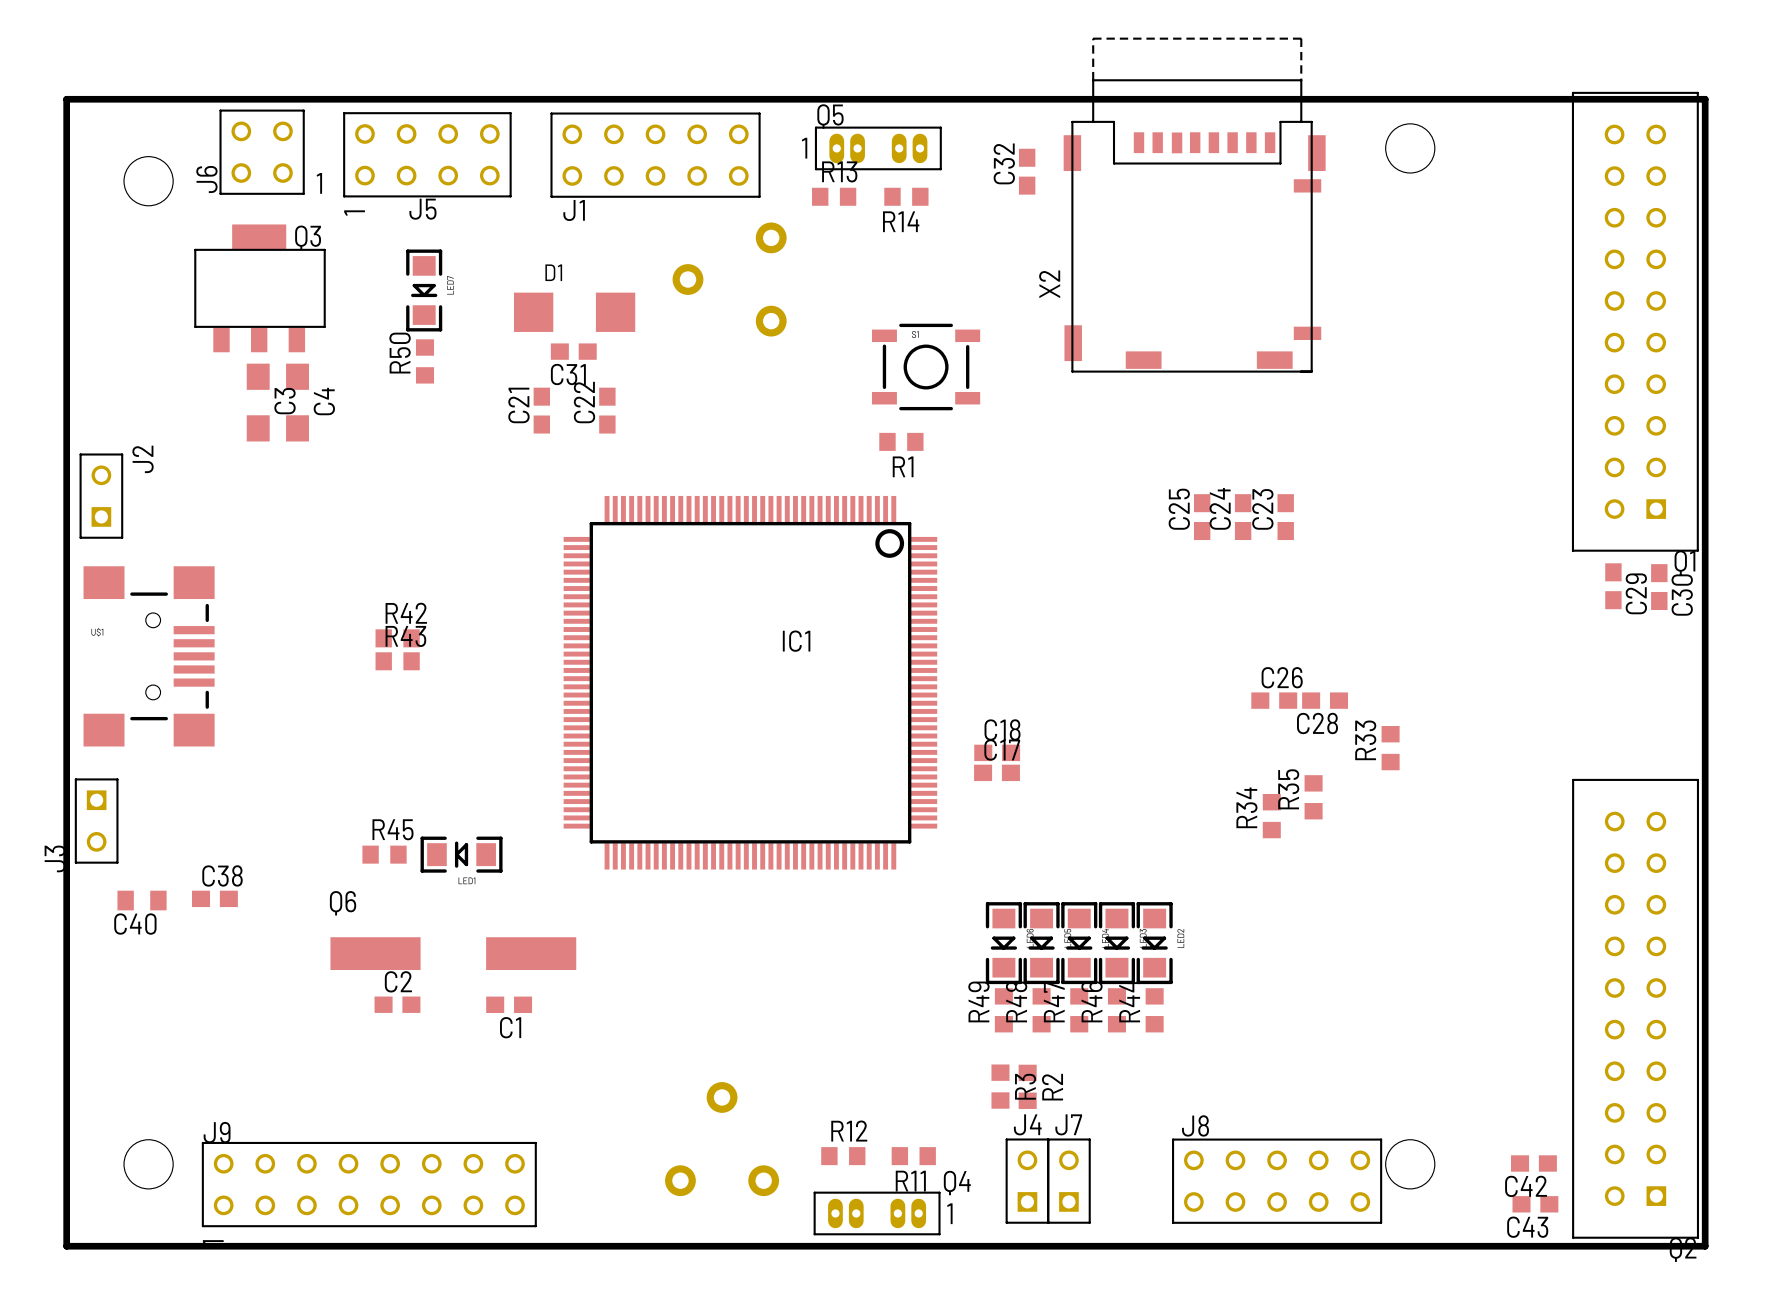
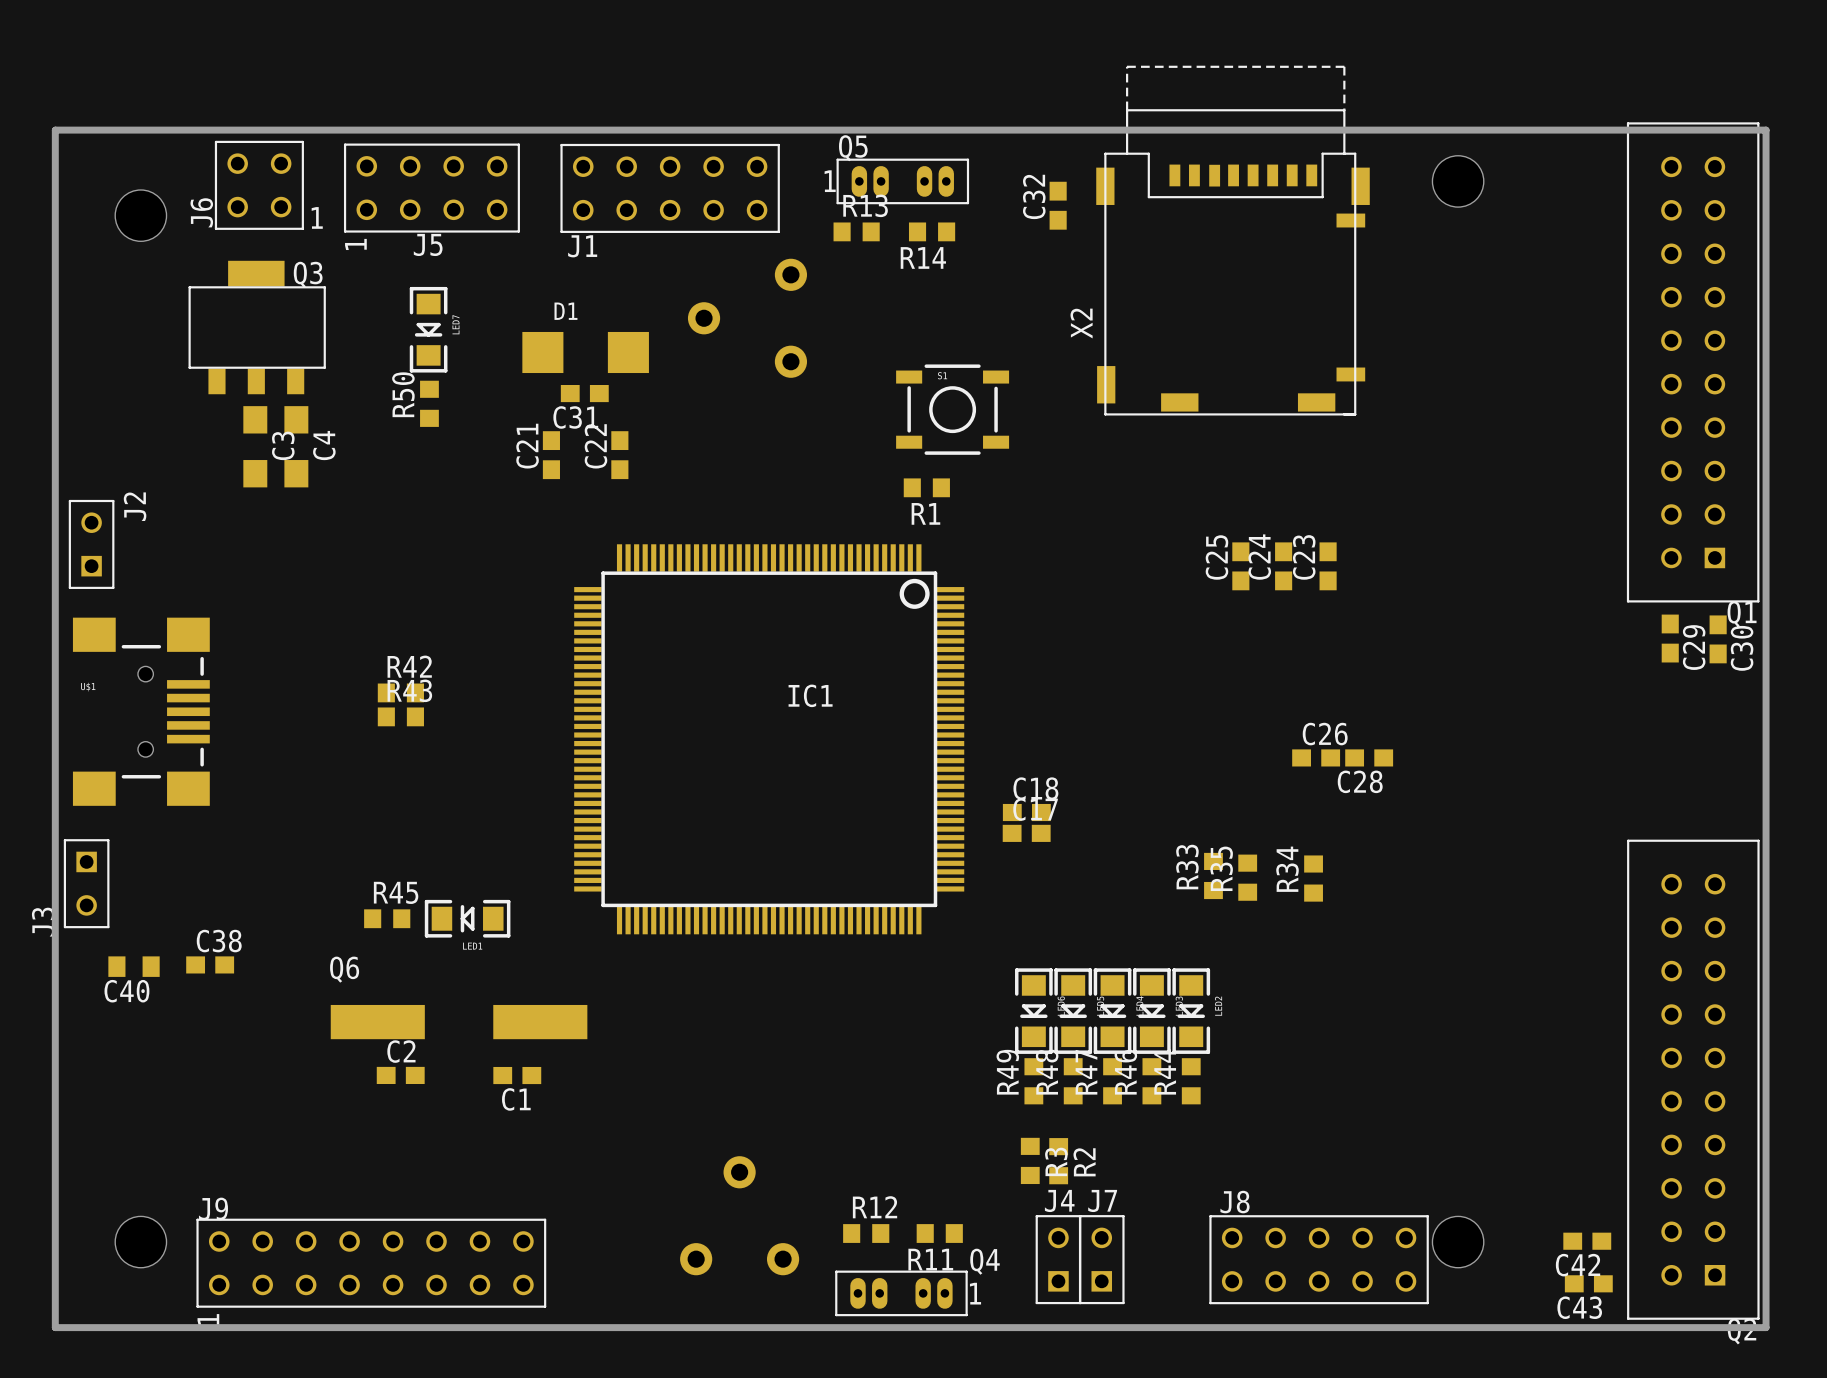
R33 position: (1390, 748) -> (1213, 875)
R35 position: (1313, 797) -> (1247, 877)

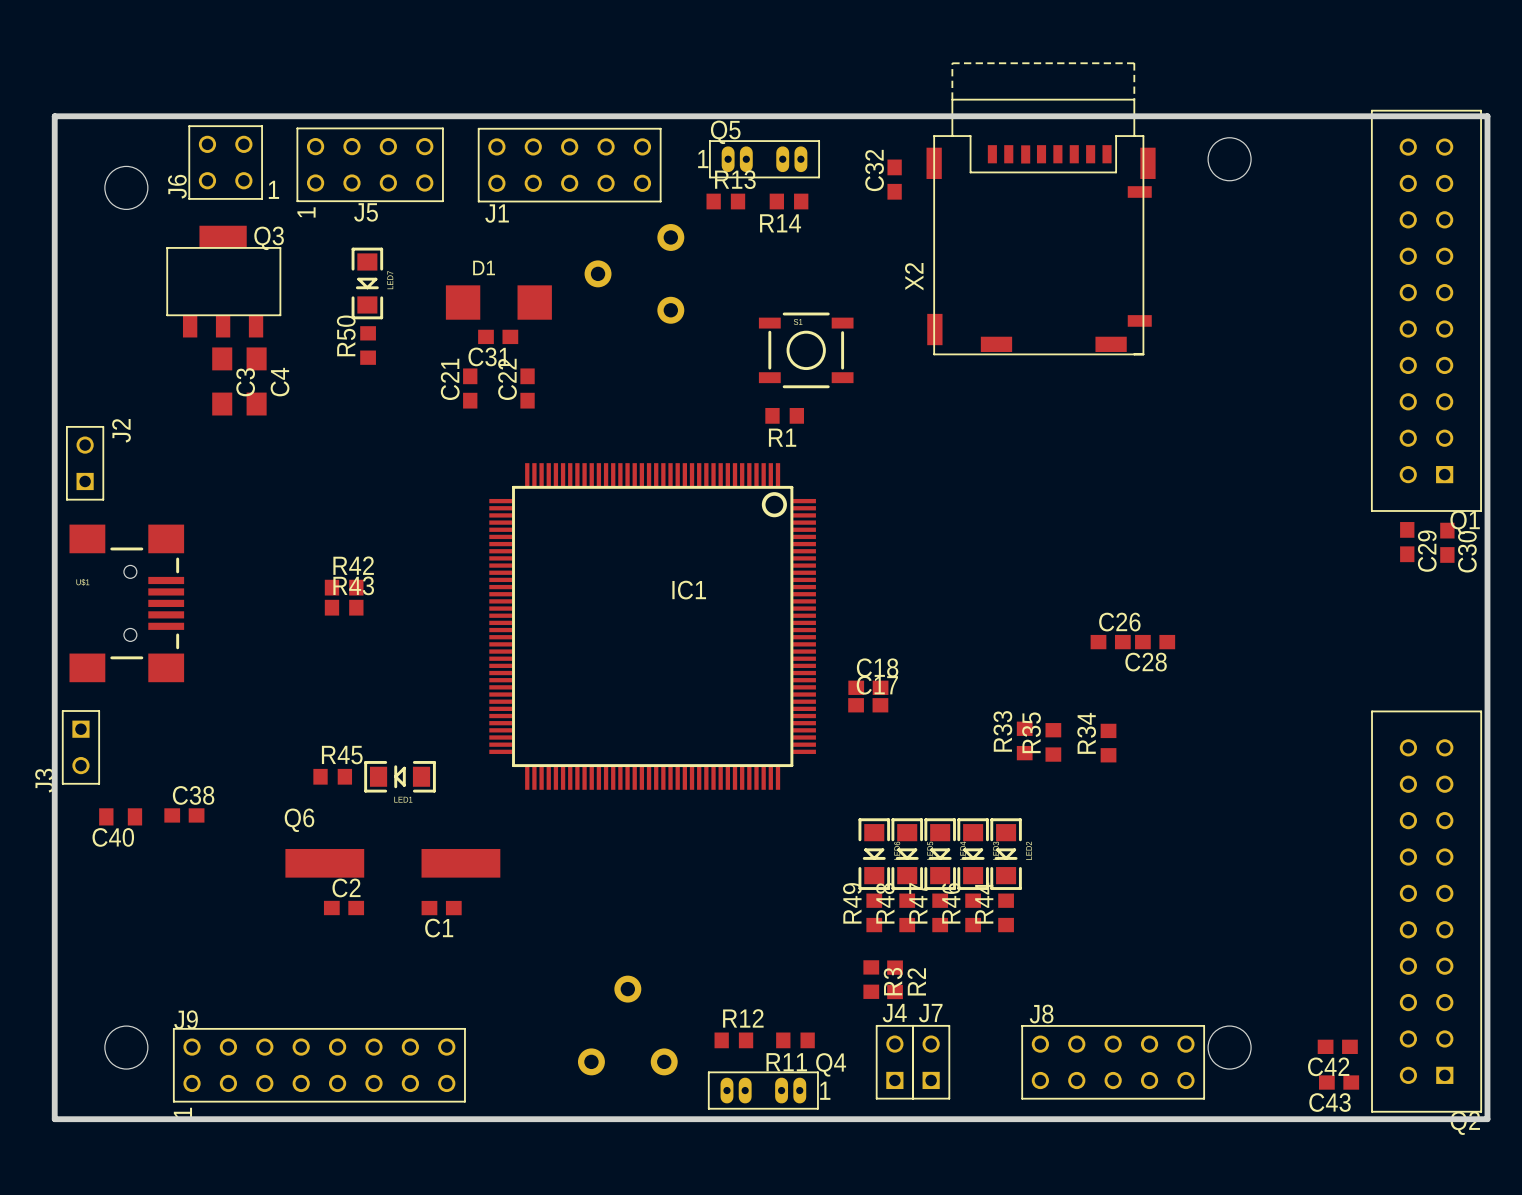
C25: (1240, 566) -> none
C24: (1283, 566) -> none
C23: (1328, 566) -> none

